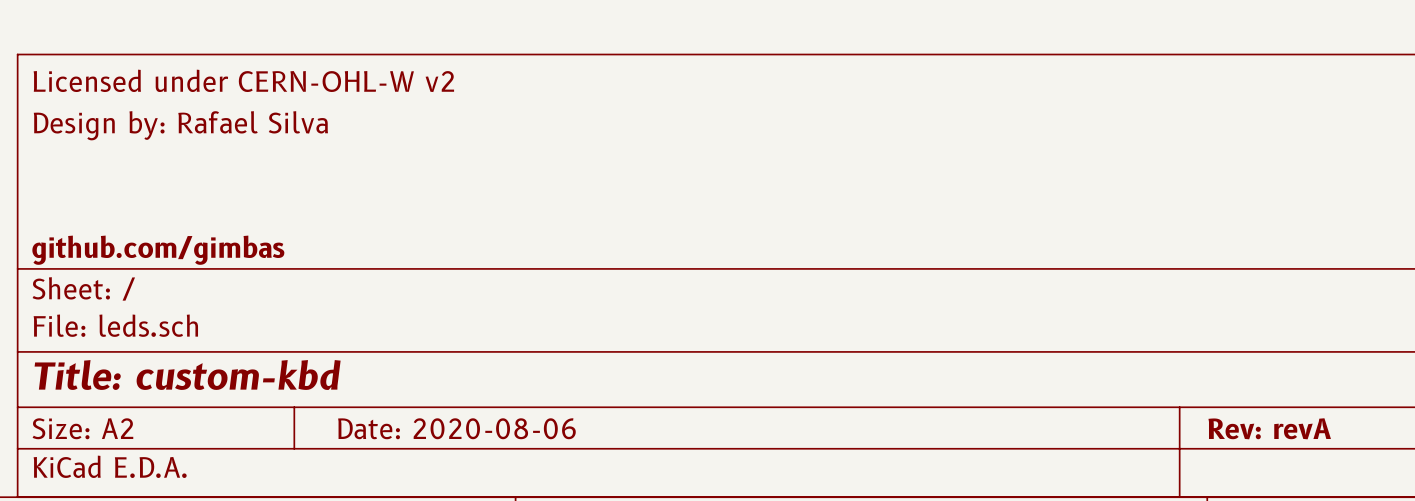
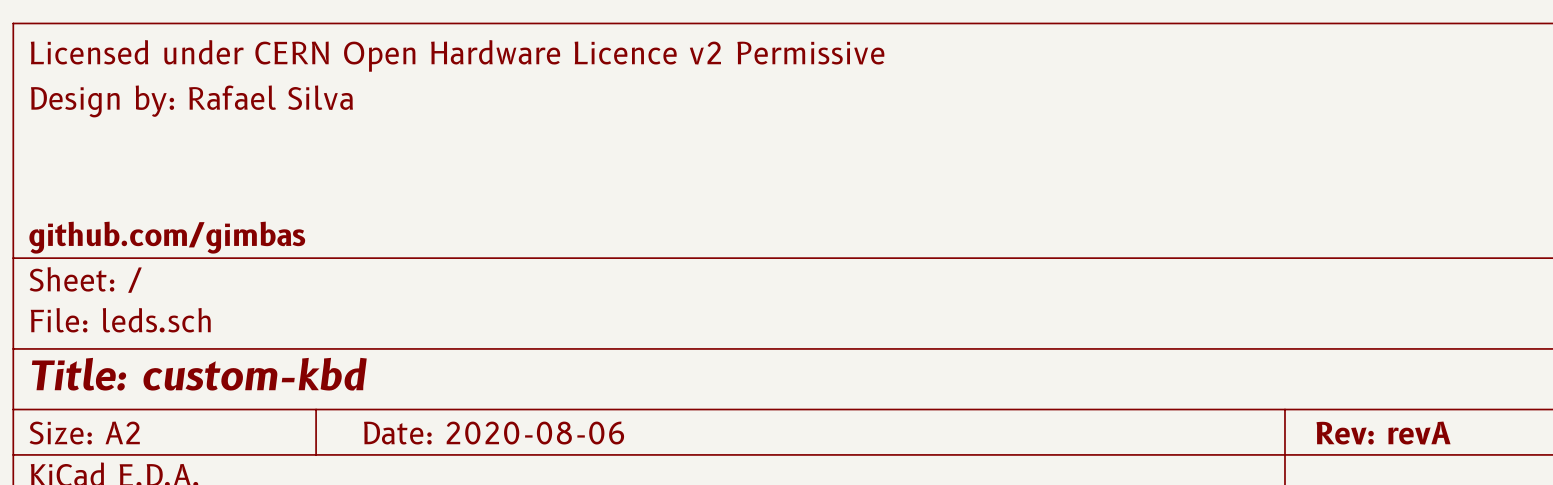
title block: Licensed under CERN-OHL-W v2 (243, 80) -> Licensed under CERN Open Hardware Licence v2 Permissive (457, 55)

